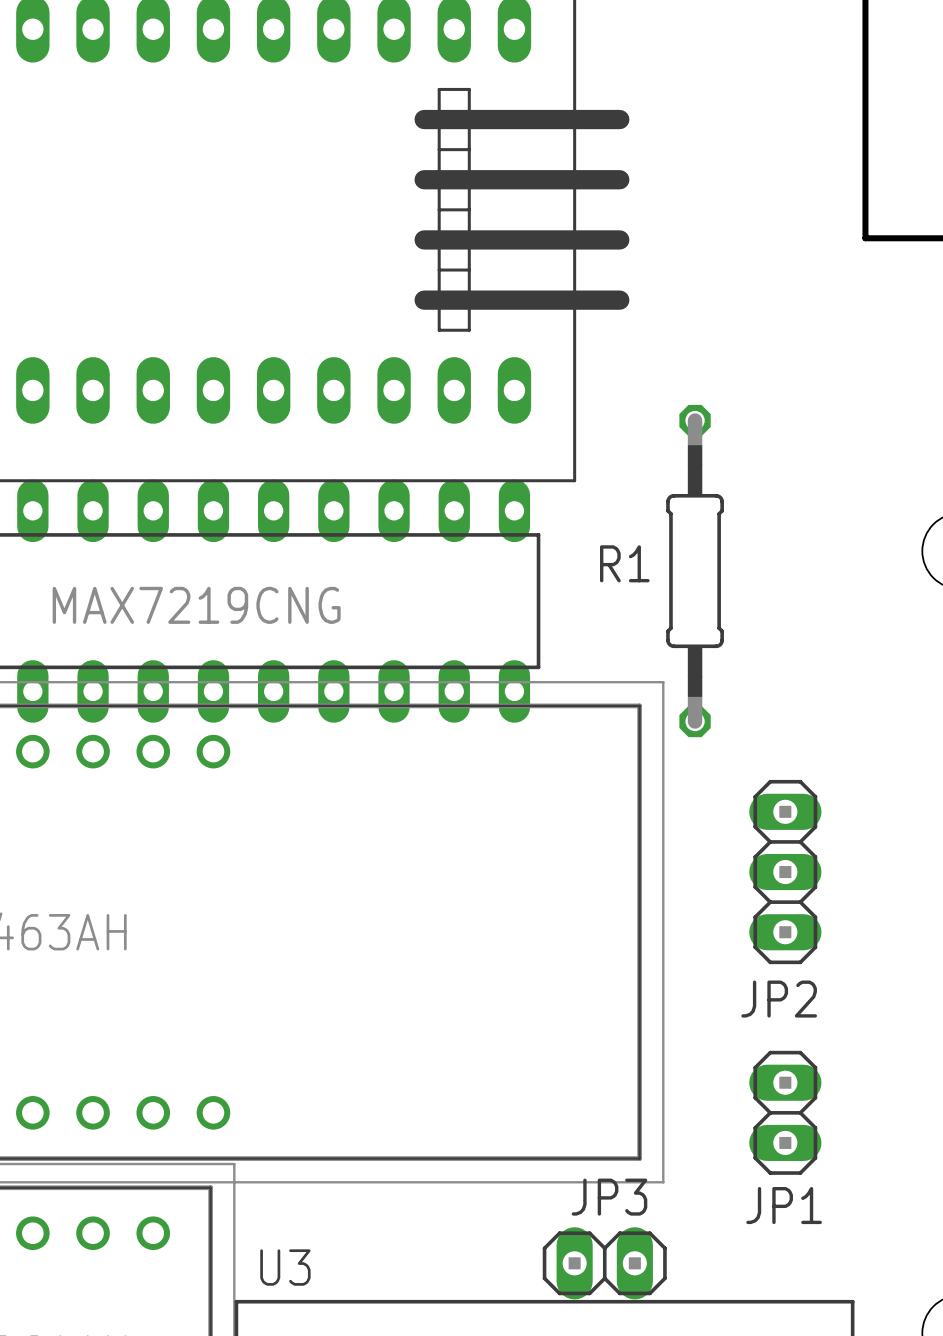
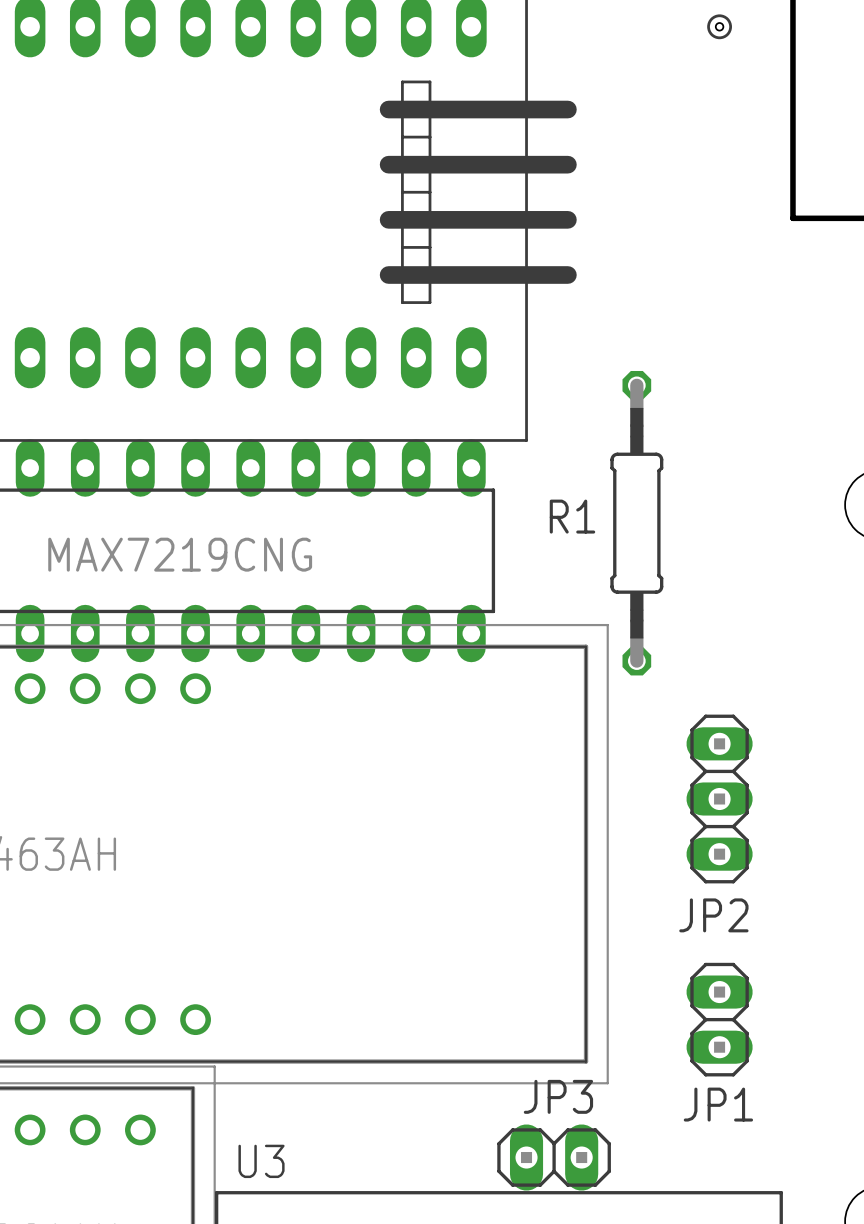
drawing: none -> [707, 14, 732, 40]
hole: none -> (719, 26)

